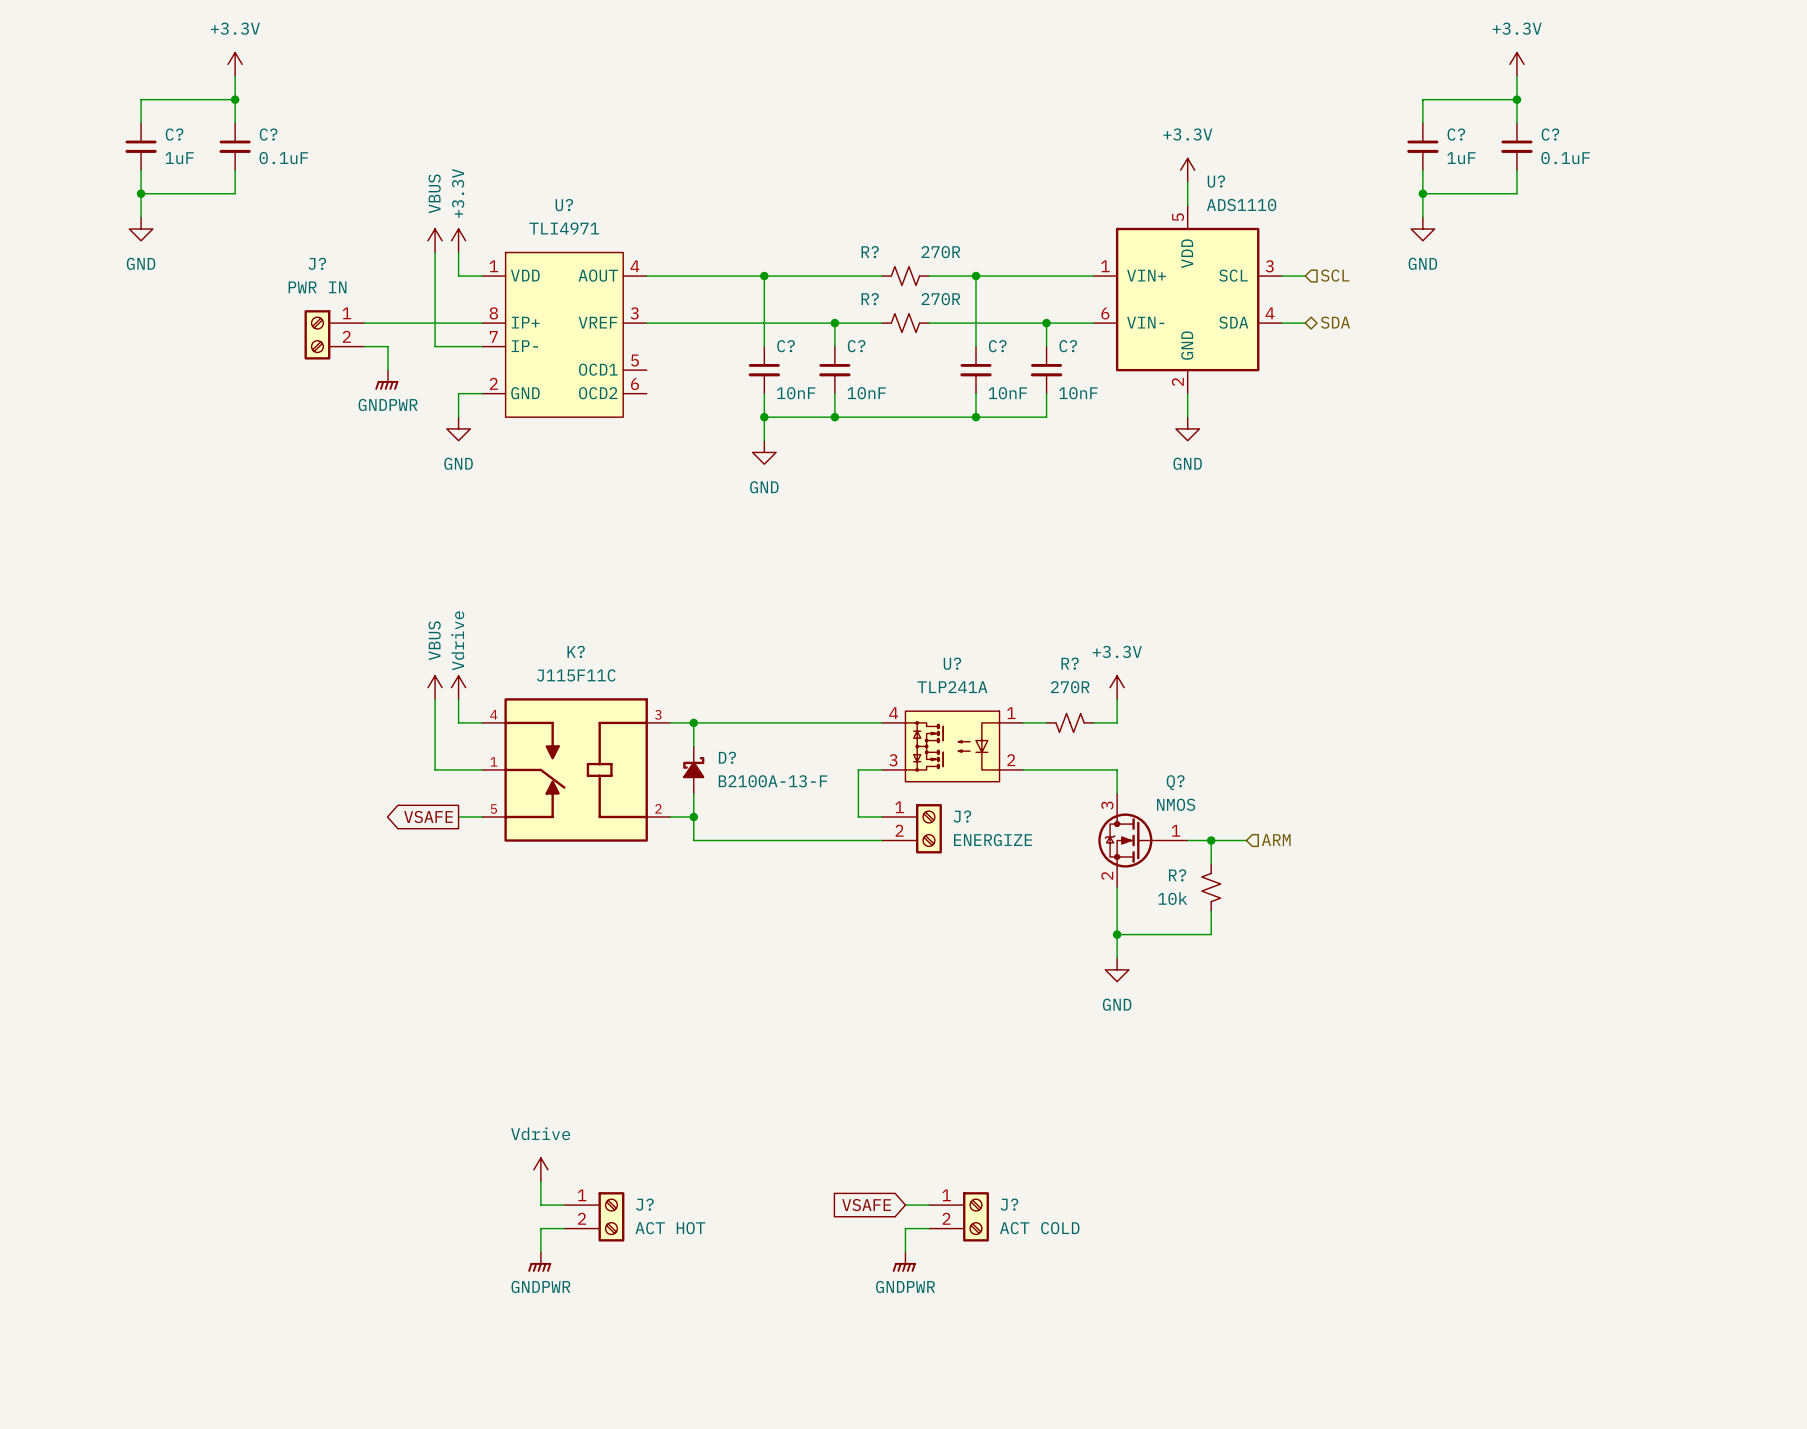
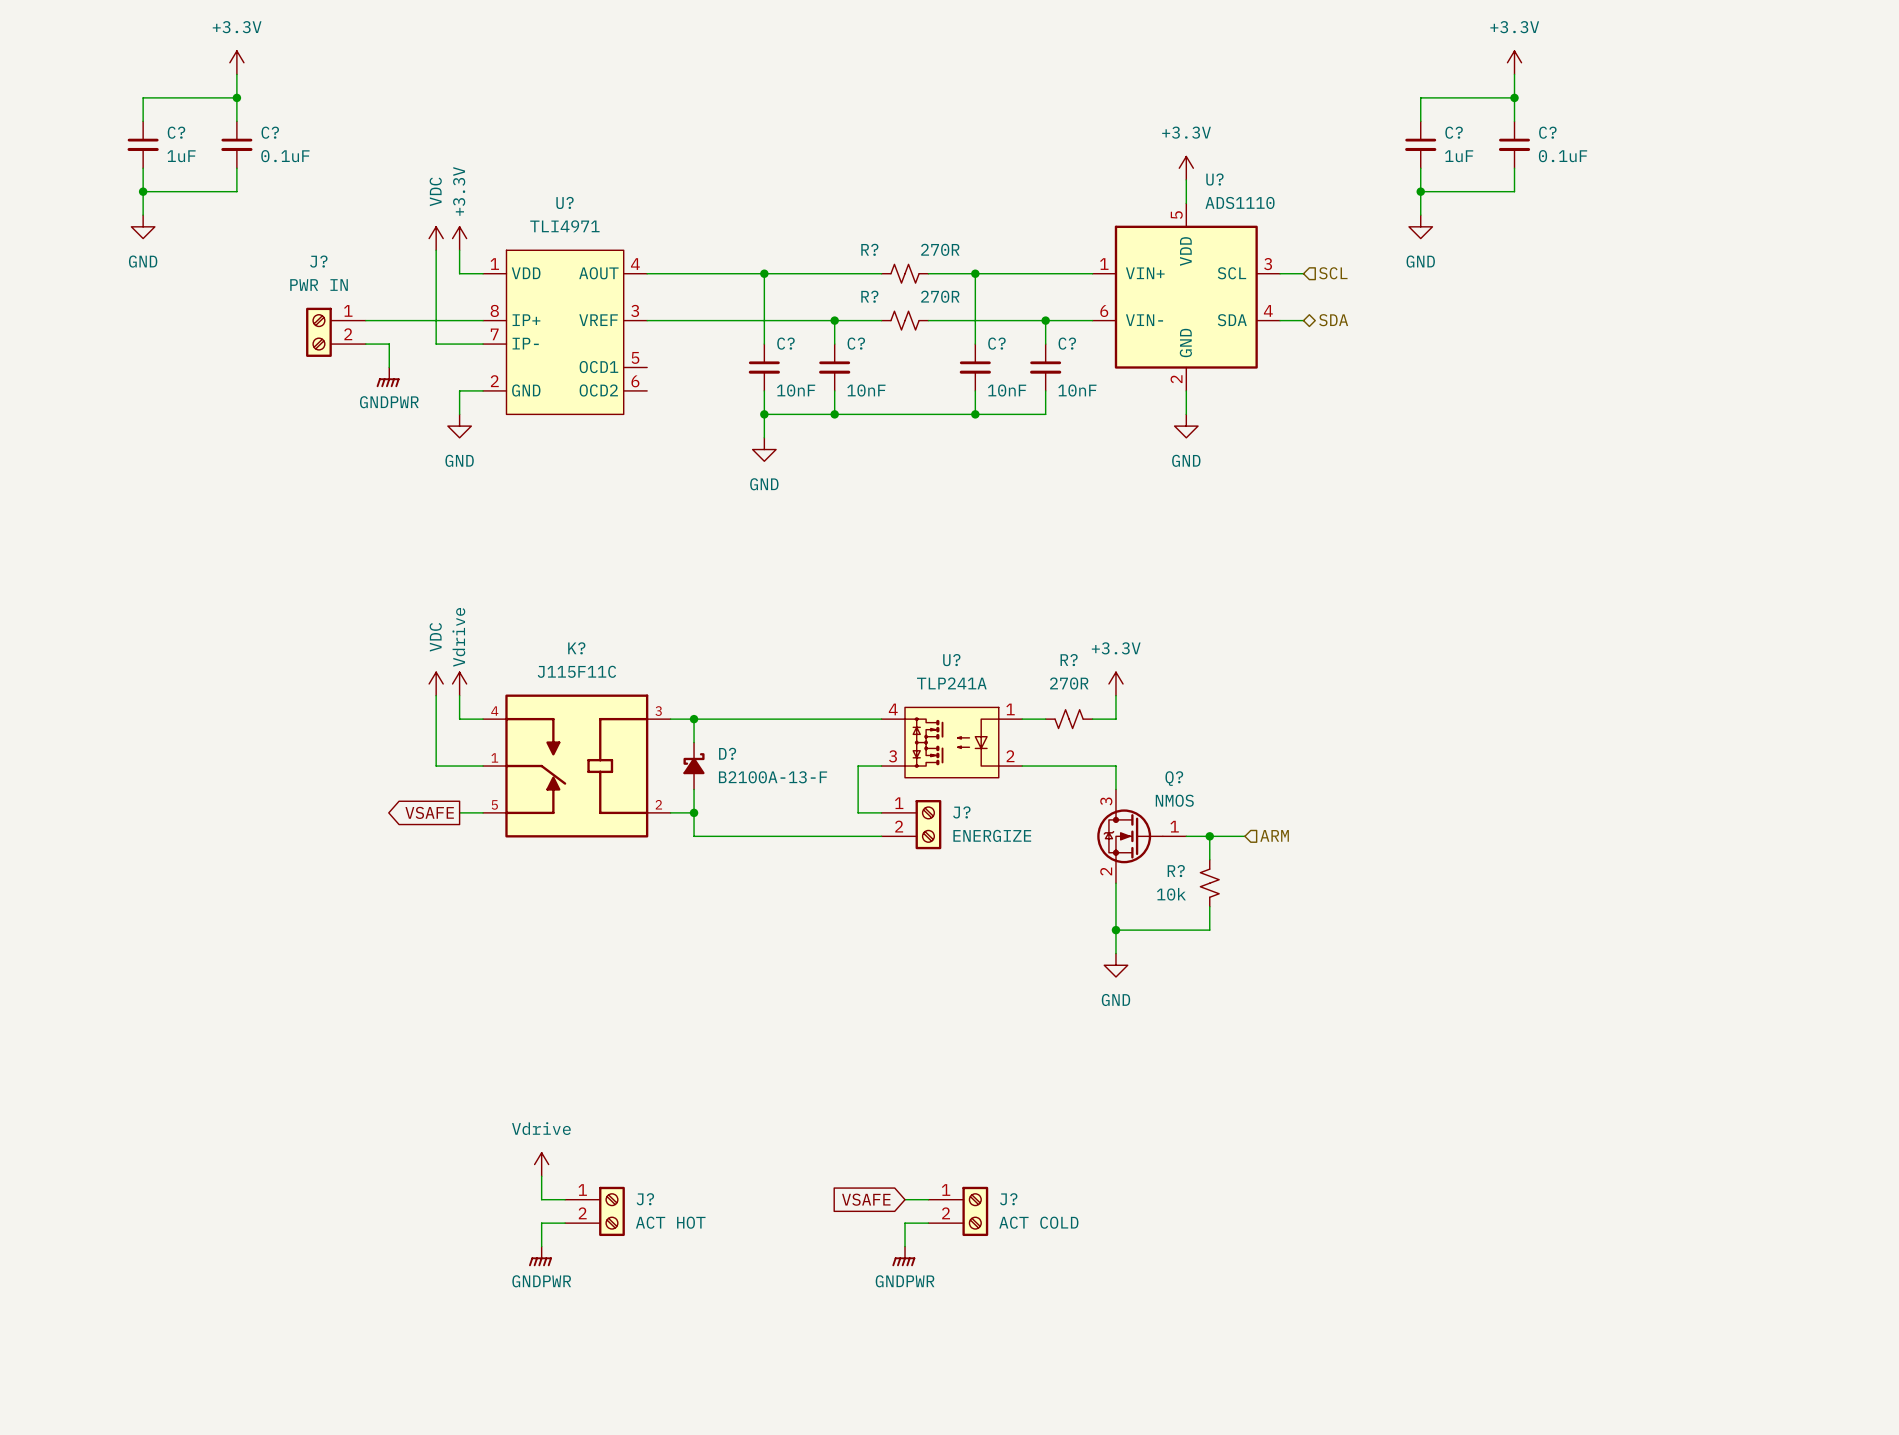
power symbol: VBUS (435, 240) -> VDC (436, 238)
power symbol: VBUS (435, 687) -> VDC (436, 683)

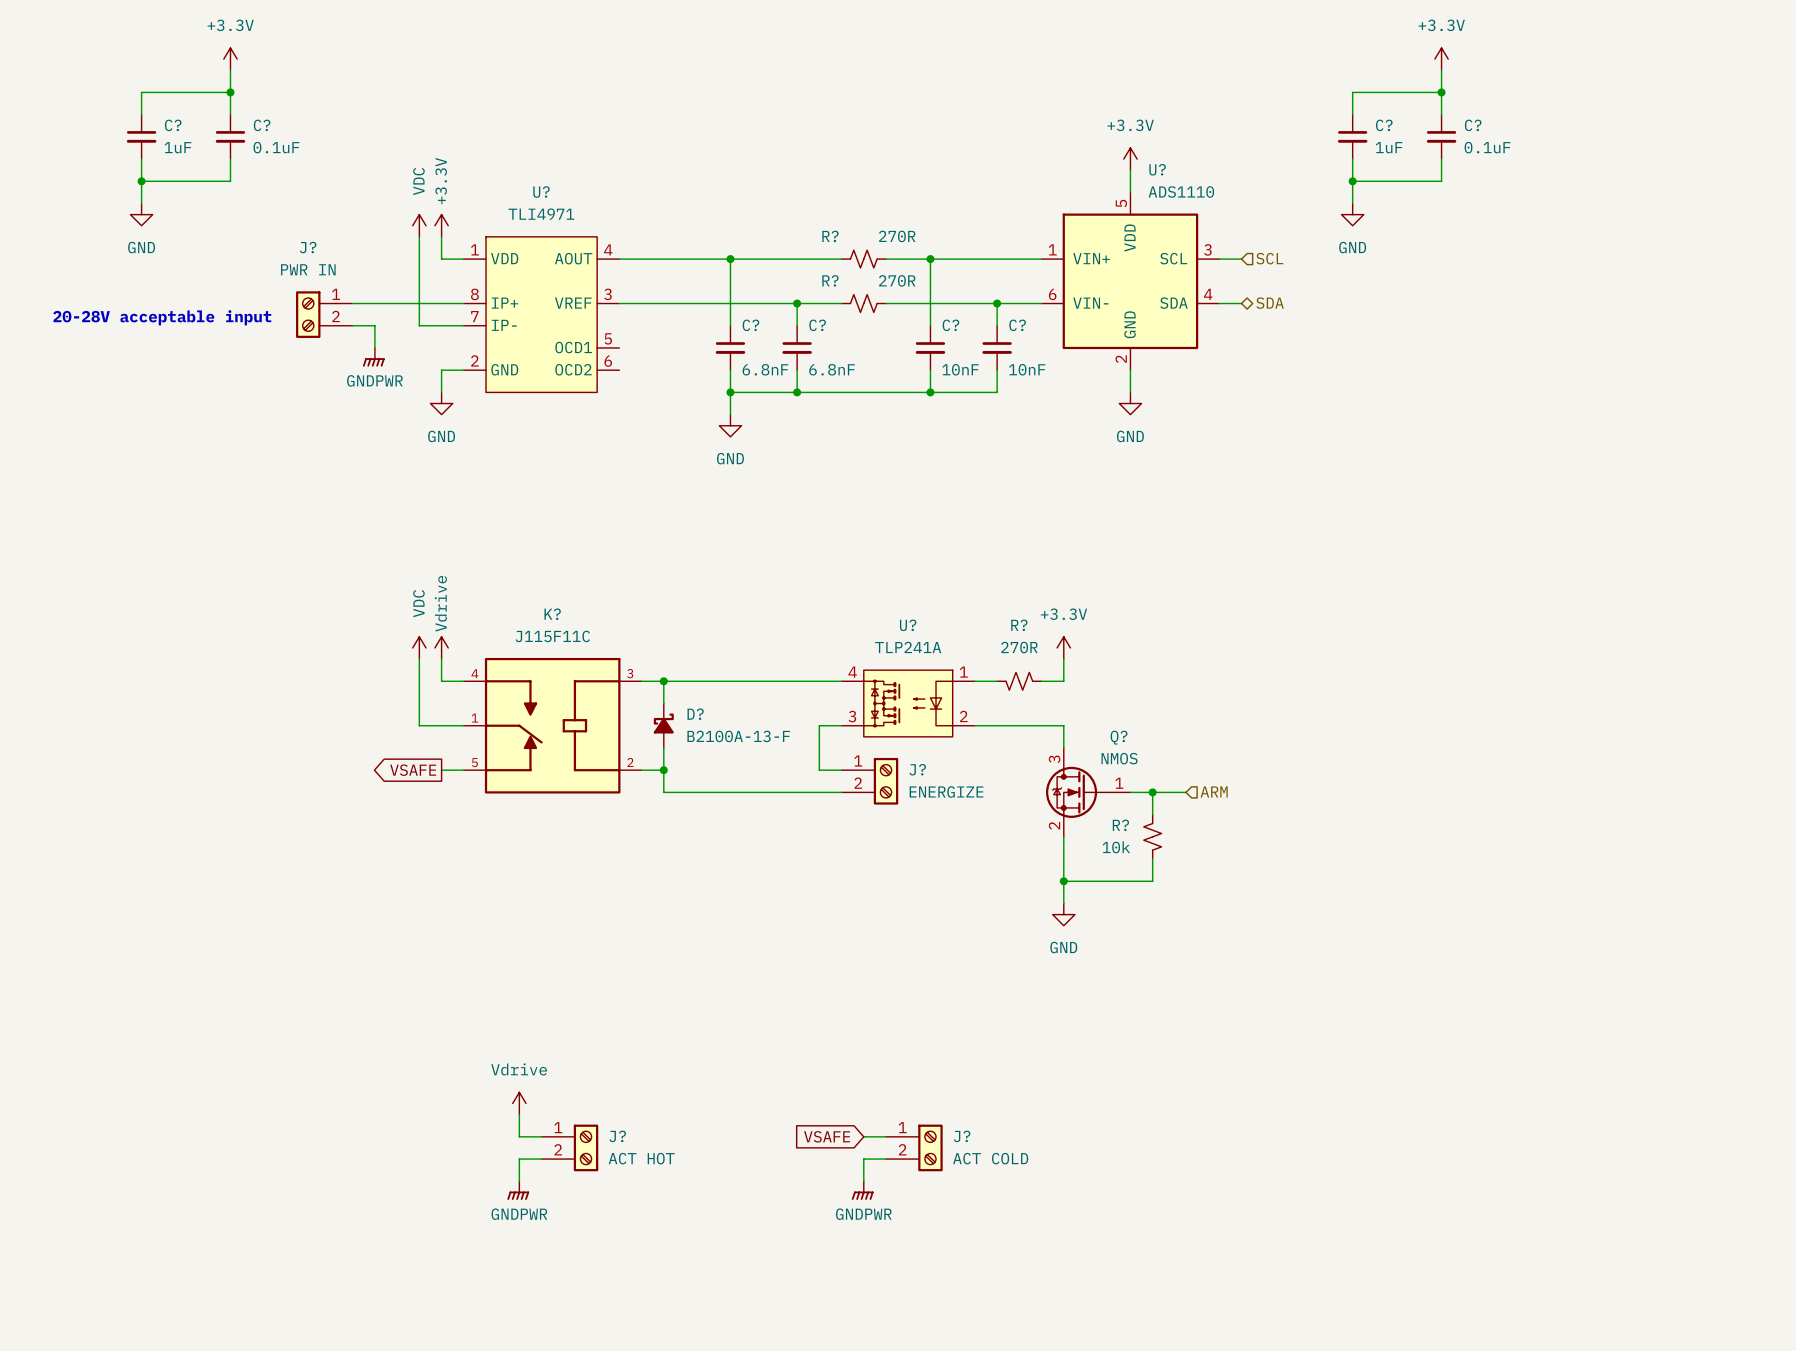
text: none -> 20-28V acceptable input (162, 317)
C? value: 10nF (796, 390) -> 6.8nF (765, 369)
C? value: 10nF (866, 390) -> 6.8nF (832, 369)

